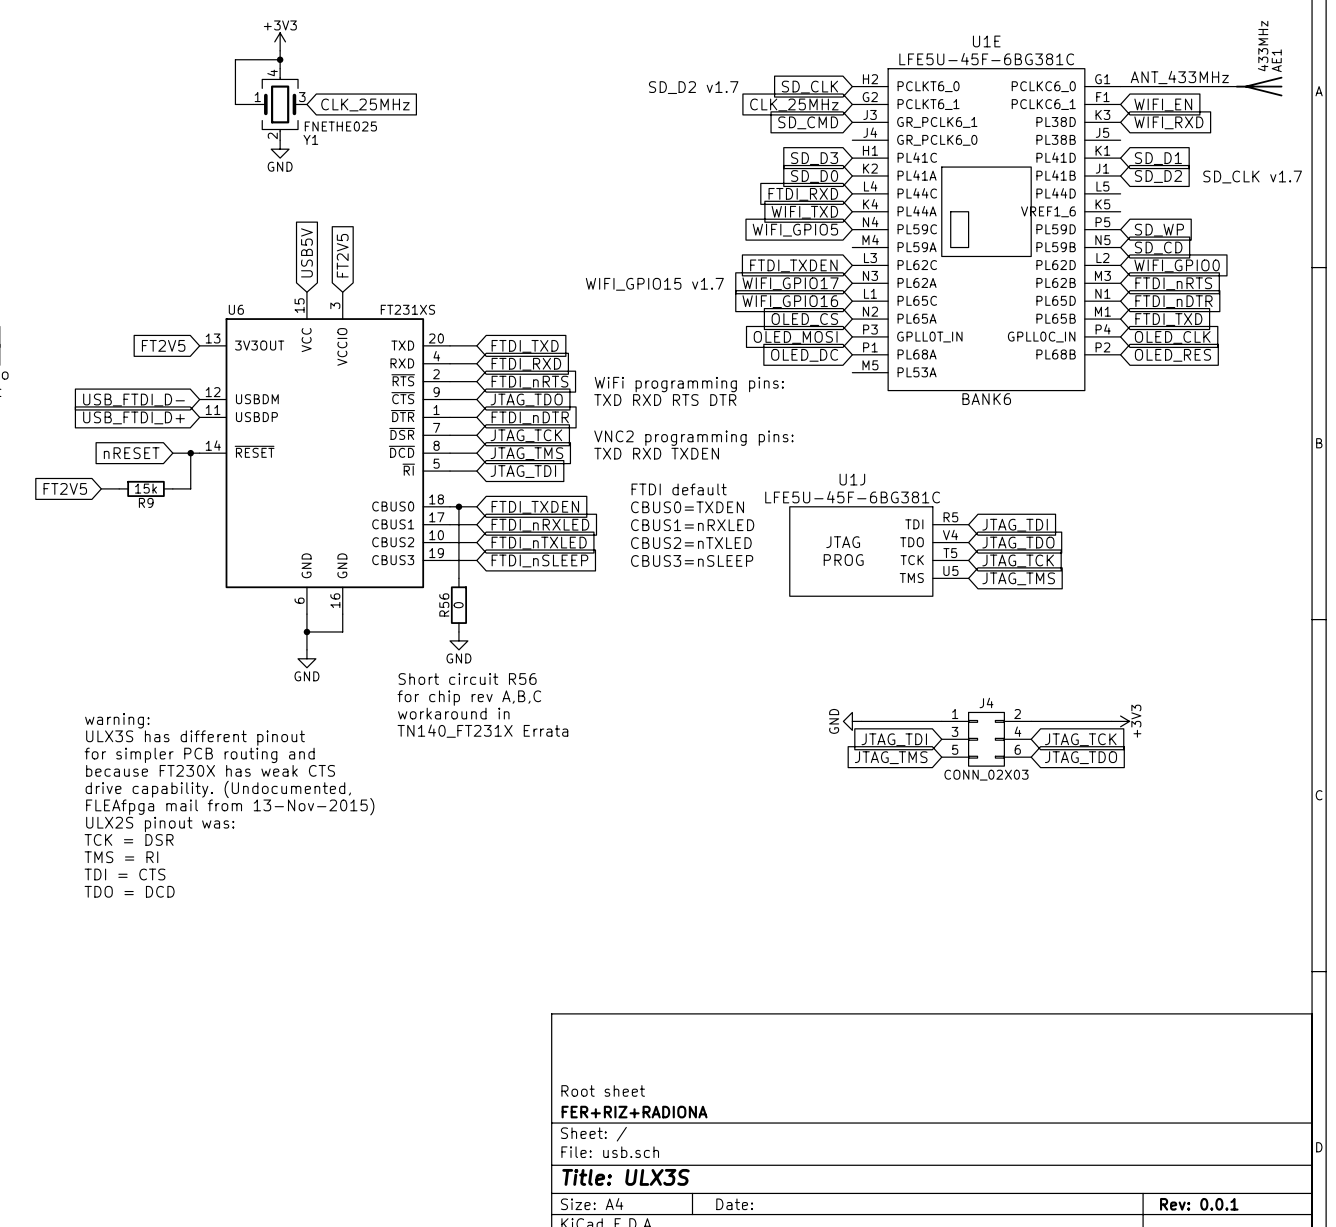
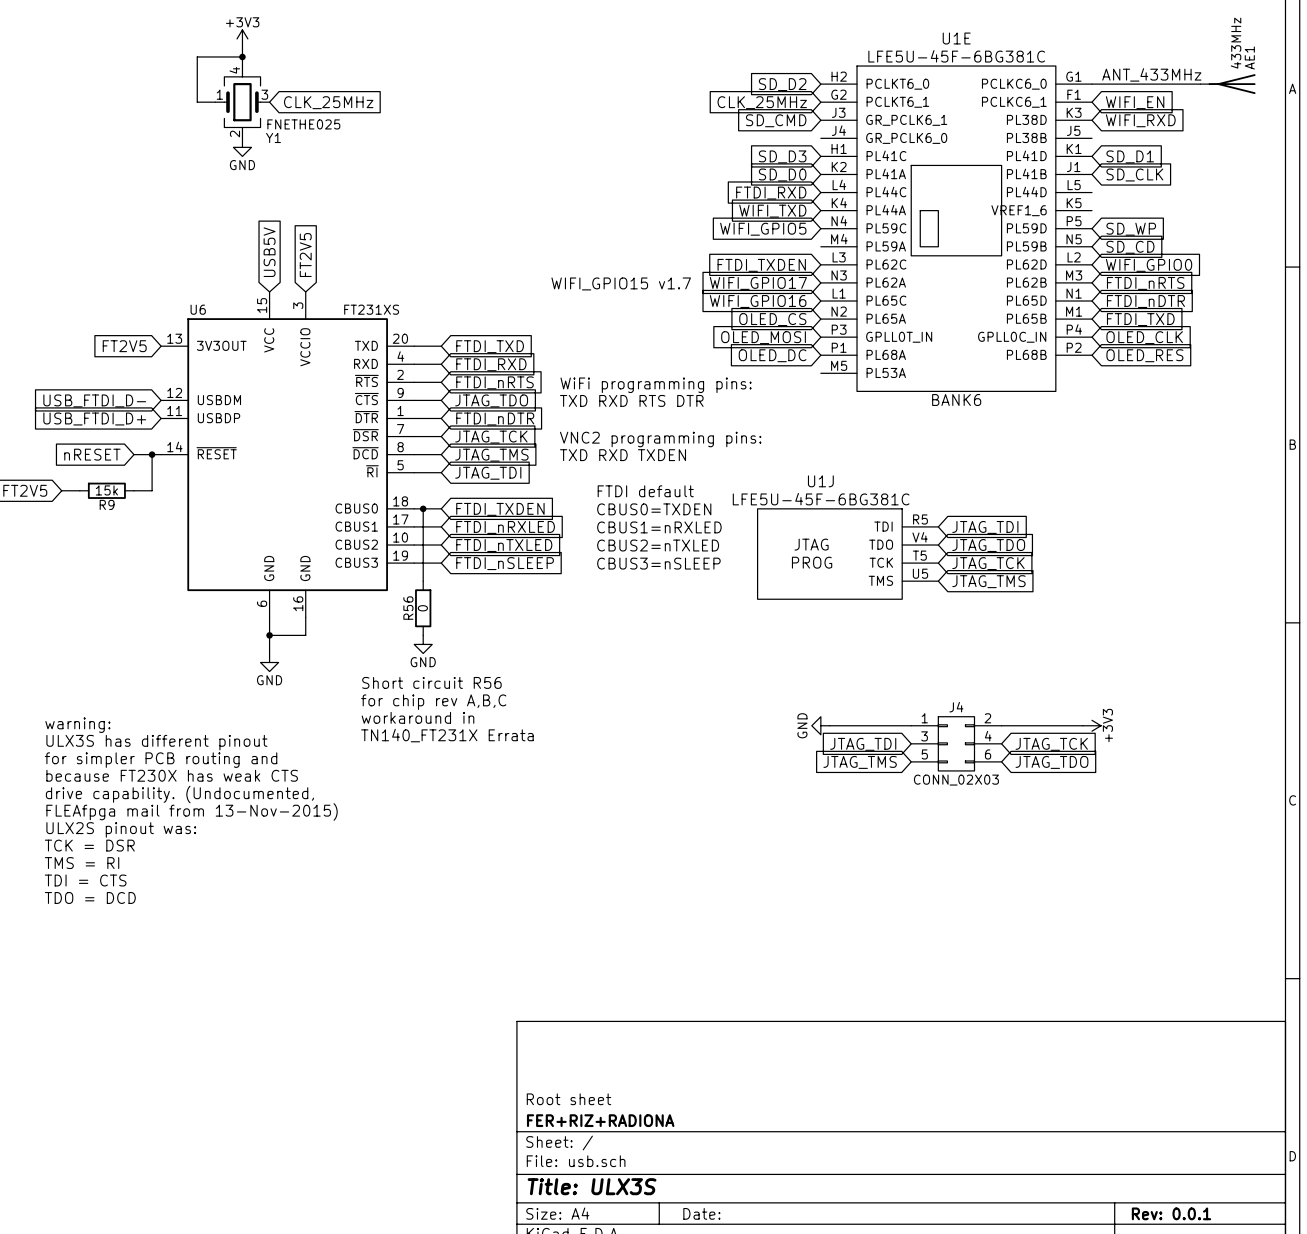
text: SD_D2 v1.7 (693, 87) -> none
global label: SD_CLK (809, 87) -> SD_D2 (782, 84)
global label: SD_D2 (1158, 176) -> SD_CLK (1134, 174)
text: SD_CLK v1.7 (1252, 177) -> none

